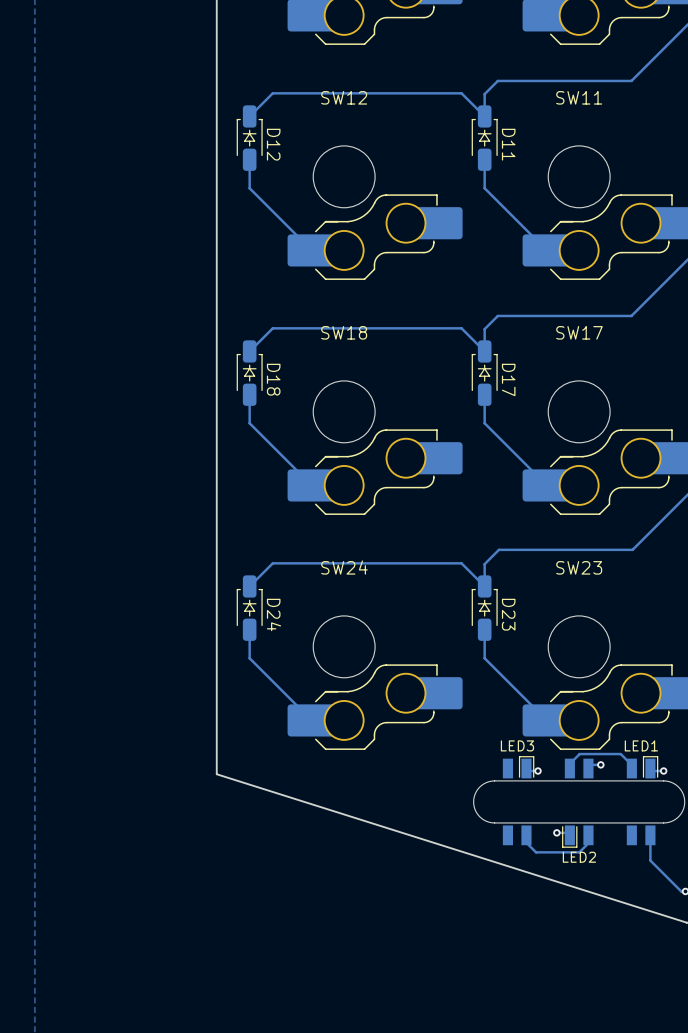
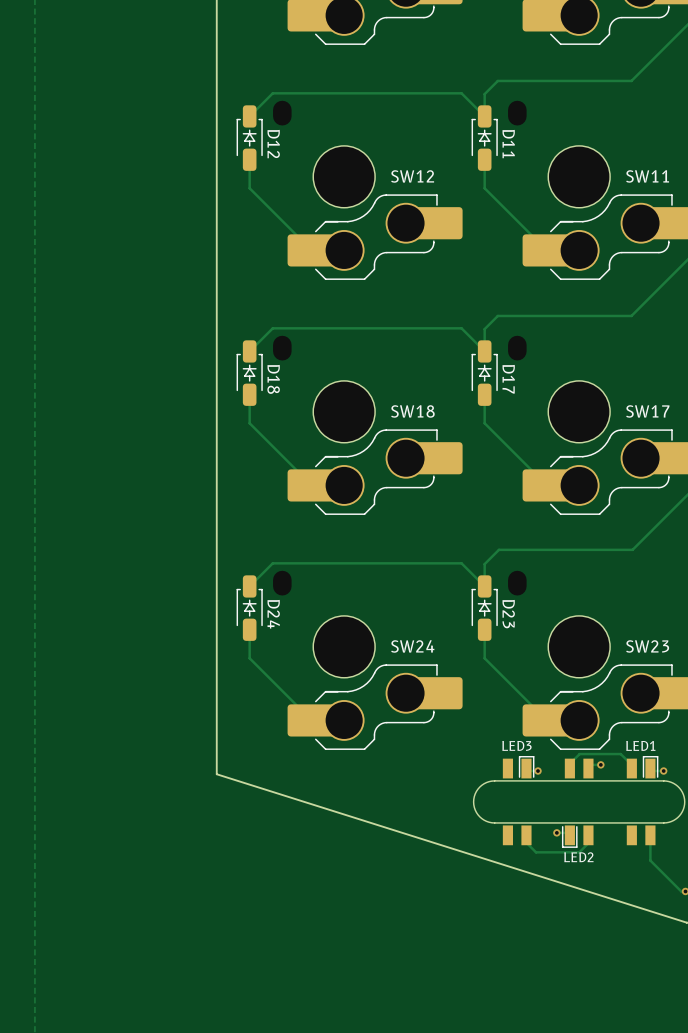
SW12 name position: SW12 (344, 97) -> SW12 (412, 176)
SW11 name position: SW11 (579, 97) -> SW11 (647, 176)
SW18 name position: SW18 (344, 332) -> SW18 (412, 411)
SW17 name position: SW17 (579, 332) -> SW17 (647, 411)
SW24 name position: SW24 (344, 567) -> SW24 (412, 646)
SW23 name position: SW23 (579, 567) -> SW23 (647, 646)

